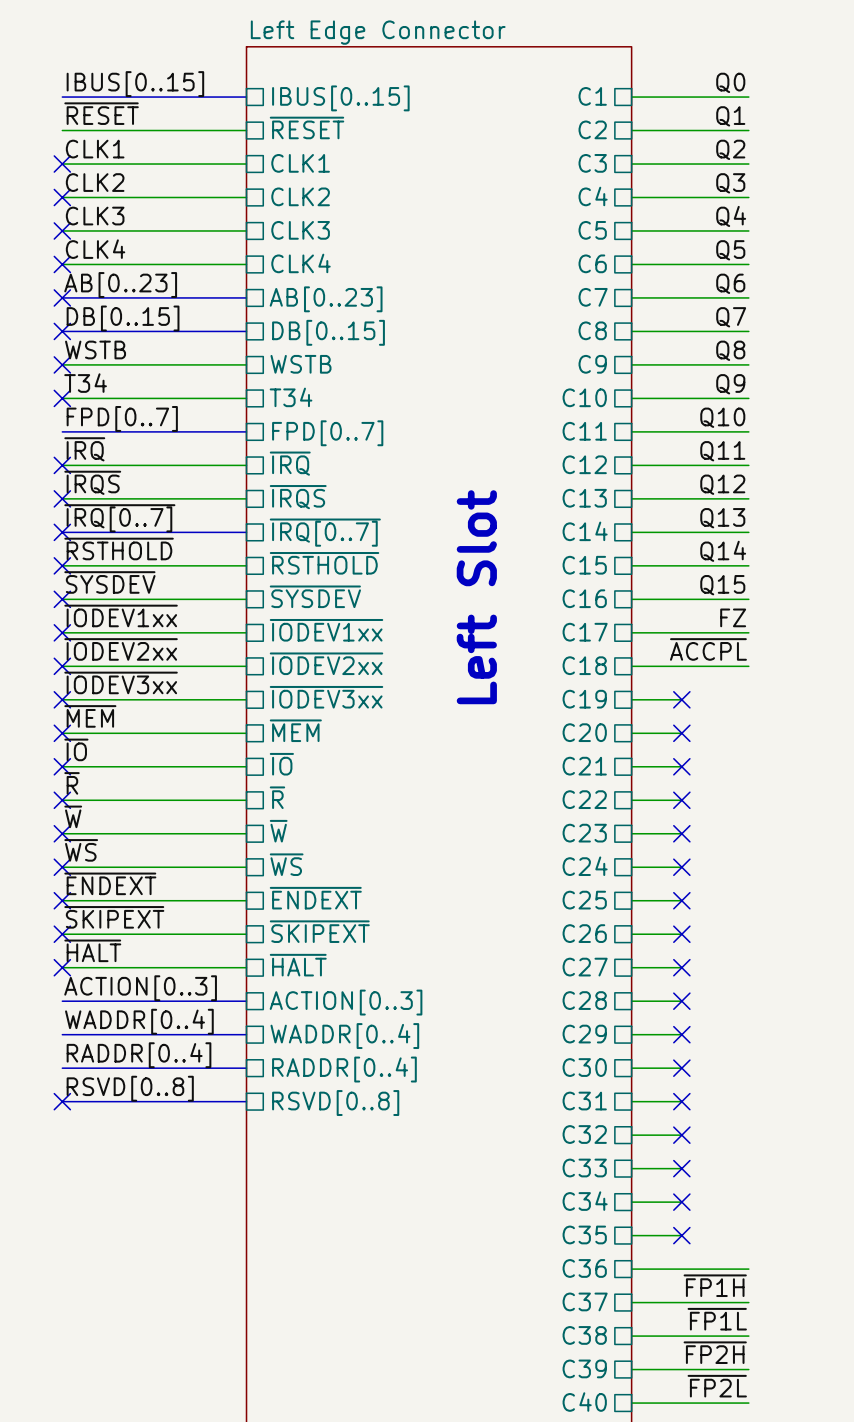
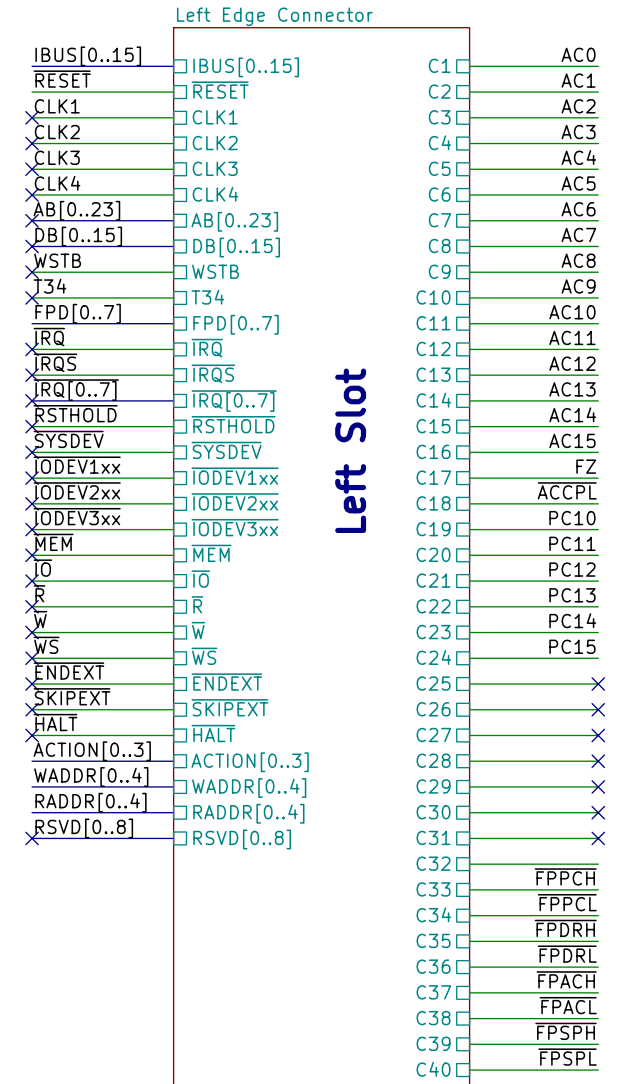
label: Q0 (730, 82) -> none
label: none -> AC0 (578, 54)
wire: none -> (559, 66) (598, 66)
label: none -> AC1 (578, 80)
label: Q1 (730, 116) -> none
wire: none -> (559, 92) (598, 92)
label: Q2 (730, 149) -> none
label: none -> AC2 (578, 106)
wire: none -> (559, 117) (598, 117)
label: none -> AC3 (578, 132)
label: Q3 (730, 183) -> none
wire: none -> (559, 143) (598, 143)
label: none -> AC4 (578, 157)
label: Q4 (731, 216) -> none
wire: none -> (559, 169) (598, 169)
label: none -> AC5 (578, 183)
label: Q5 (730, 250) -> none
wire: none -> (559, 195) (598, 195)
label: Q6 (730, 283) -> none
label: none -> AC6 (578, 209)
wire: none -> (559, 220) (598, 220)
label: none -> AC7 (578, 235)
label: Q7 (731, 317) -> none
wire: none -> (559, 246) (598, 246)
label: none -> AC8 (578, 260)
label: Q8 (730, 350) -> none
wire: none -> (559, 272) (598, 272)
label: none -> AC9 (578, 286)
label: Q9 (730, 384) -> none
wire: none -> (559, 297) (598, 297)
label: none -> AC10 (572, 312)
label: Q10 (722, 417) -> none
wire: none -> (559, 323) (598, 323)
label: none -> AC11 (572, 337)
label: Q11 (722, 451) -> none
wire: none -> (559, 349) (598, 349)
label: none -> AC12 (572, 363)
label: Q12 (722, 484) -> none
wire: none -> (559, 375) (598, 375)
label: none -> AC13 (572, 389)
label: Q13 (722, 518) -> none
wire: none -> (559, 400) (598, 400)
label: none -> AC14 (572, 414)
label: Q14 (723, 551) -> none
wire: none -> (559, 426) (598, 426)
label: none -> AC15 (572, 440)
label: Q15 (722, 585) -> none
wire: none -> (559, 452) (598, 452)
label position: FZ (733, 617) -> FZ (586, 466)
wire: none -> (559, 478) (598, 478)
label position: ~{ACCPL} (708, 649) -> ~{ACCPL} (567, 490)
wire: none -> (559, 503) (598, 503)
label: none -> PC10 (572, 518)
wire: none -> (508, 529) (598, 529)
no-connect mark: (681, 699) -> none
label: none -> PC11 (572, 543)
wire: none -> (508, 555) (598, 555)
no-connect mark: (681, 733) -> none
label: none -> PC12 (572, 569)
wire: none -> (508, 581) (598, 581)
no-connect mark: (681, 766) -> none
label: none -> PC13 (572, 595)
wire: none -> (508, 606) (598, 606)
no-connect mark: (681, 800) -> none
label: none -> PC14 (572, 620)
wire: none -> (508, 632) (598, 632)
no-connect mark: (681, 833) -> none
label: none -> PC15 (572, 646)
wire: none -> (508, 658) (598, 658)
no-connect mark: (681, 867) -> none
wire: none -> (508, 684) (598, 684)
no-connect mark: (681, 900) -> none
no-connect mark: none -> (598, 684)
wire: none -> (508, 709) (598, 709)
no-connect mark: (681, 934) -> none
no-connect mark: none -> (598, 709)
wire: none -> (508, 735) (598, 735)
no-connect mark: (681, 967) -> none
no-connect mark: none -> (598, 735)
wire: none -> (508, 761) (598, 761)
no-connect mark: (681, 1001) -> none
no-connect mark: none -> (598, 761)
wire: none -> (508, 786) (598, 786)
no-connect mark: (681, 1034) -> none
no-connect mark: none -> (598, 786)
wire: none -> (508, 812) (598, 812)
no-connect mark: (681, 1068) -> none
no-connect mark: none -> (598, 812)
wire: none -> (508, 838) (598, 838)
no-connect mark: (681, 1101) -> none
no-connect mark: none -> (598, 838)
wire: none -> (508, 864) (598, 864)
no-connect mark: (681, 1135) -> none
label: none -> ~{FPPCH} (565, 876)
wire: none -> (508, 889) (598, 889)
no-connect mark: (681, 1168) -> none
label: none -> ~{FPPCL} (567, 902)
wire: none -> (508, 915) (598, 915)
no-connect mark: (681, 1202) -> none
label: none -> ~{FPDRH} (565, 928)
wire: none -> (508, 941) (598, 941)
no-connect mark: (681, 1235) -> none
label: none -> ~{FPDRL} (567, 954)
wire: none -> (559, 967) (598, 967)
label: ~{FP1H} (715, 1285) -> none
label: none -> ~{FPACH} (566, 979)
wire: none -> (559, 992) (598, 992)
label: ~{FP1L} (717, 1319) -> none
label: none -> ~{FPACL} (568, 1005)
wire: none -> (559, 1018) (598, 1018)
label: ~{FP2H} (715, 1352) -> none
label: none -> ~{FPSPH} (566, 1031)
wire: none -> (559, 1044) (598, 1044)
label: ~{FP2L} (717, 1386) -> none
label: none -> ~{FPSPL} (567, 1057)
wire: none -> (559, 1070) (598, 1070)

